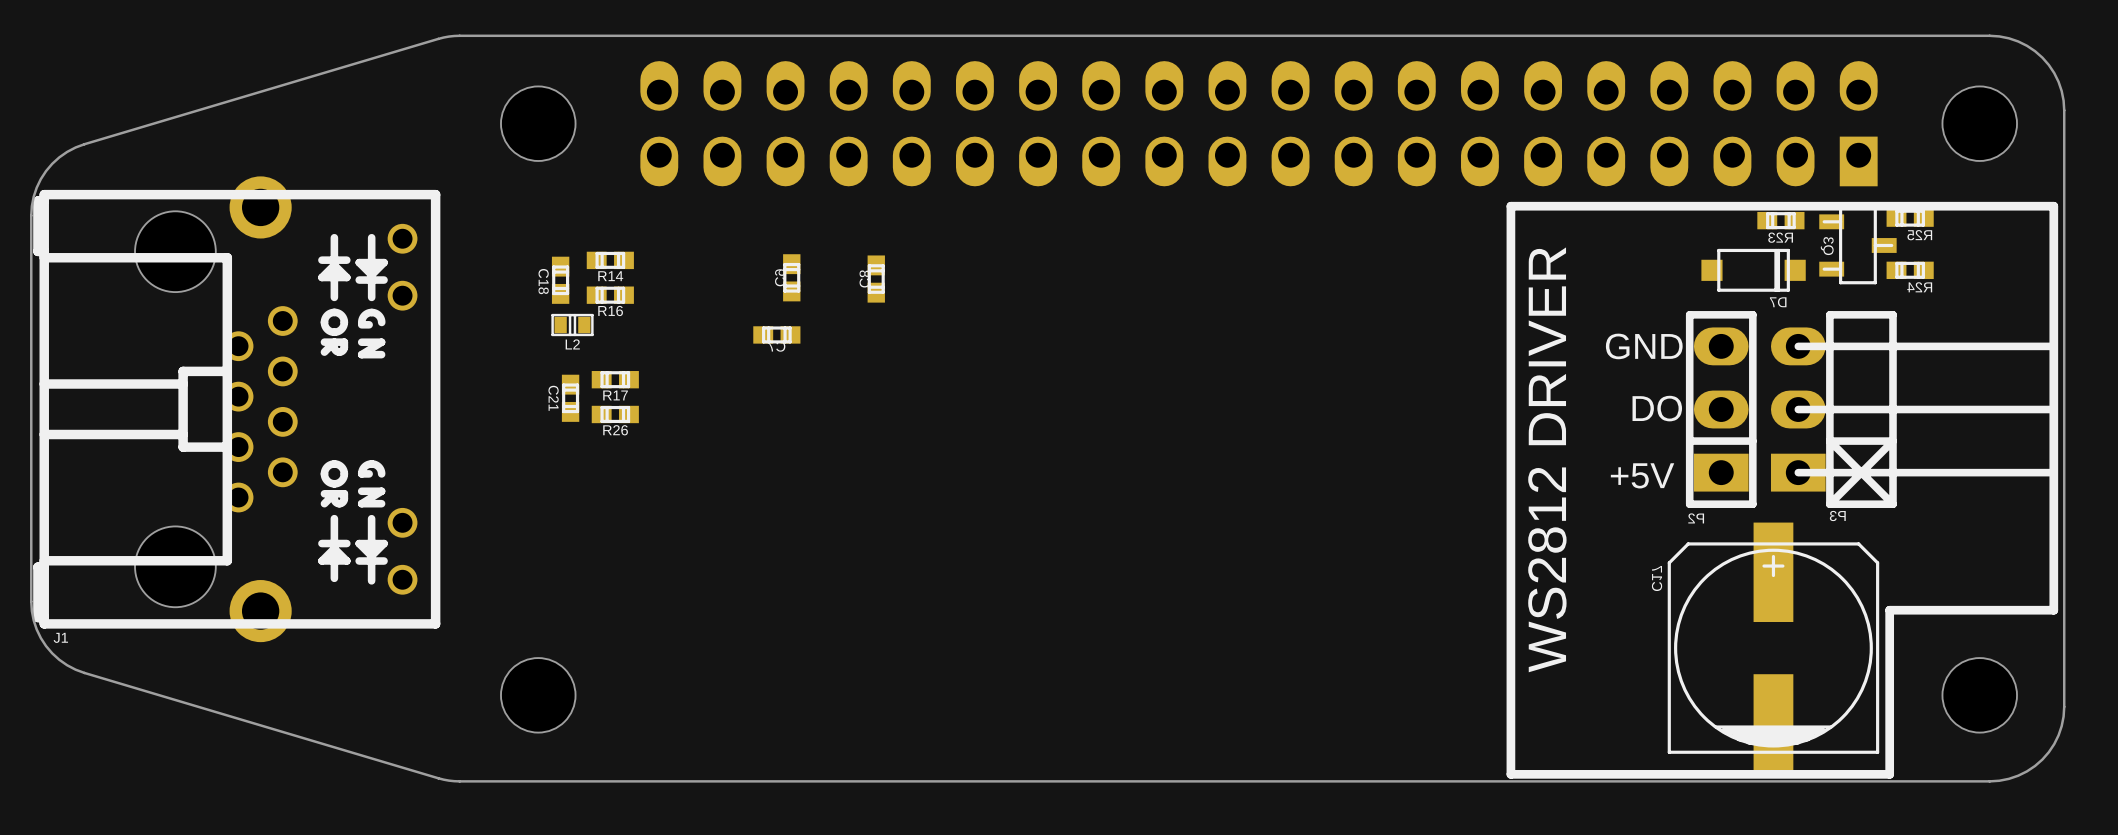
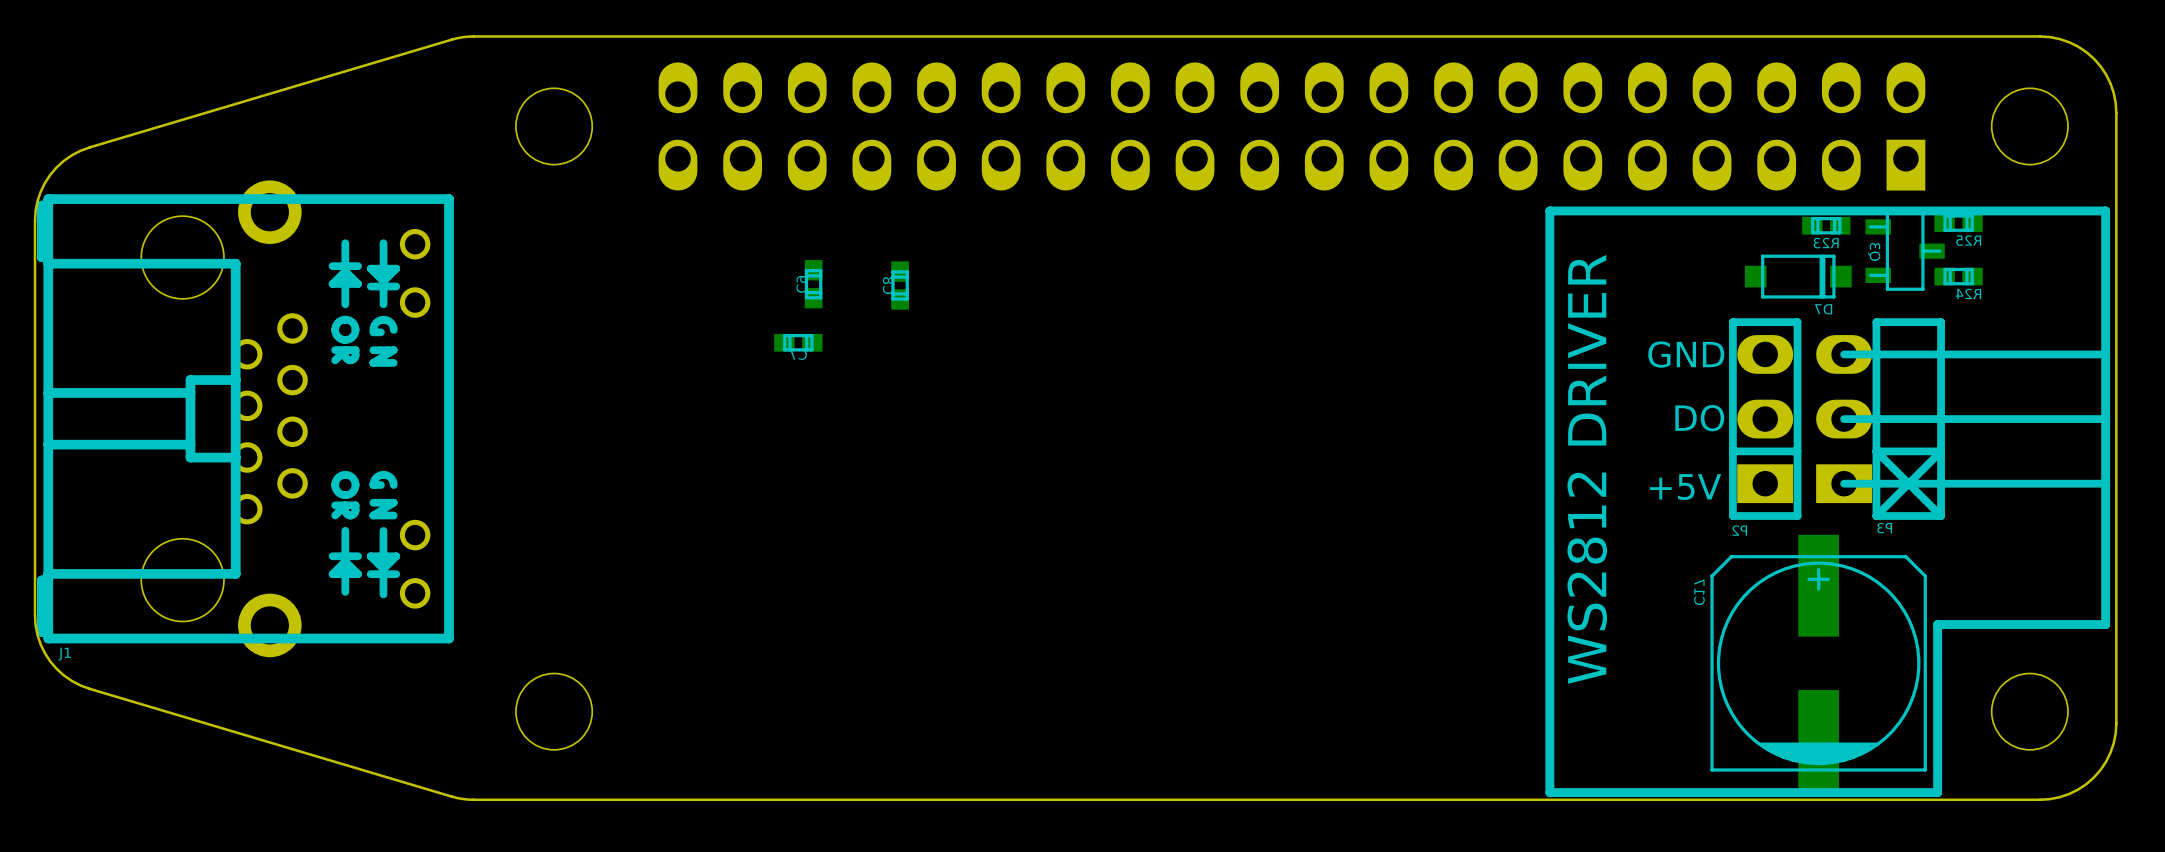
R14: (610, 260) -> none
C18: (560, 280) -> none
R16: (610, 295) -> none
L2: (572, 325) -> none
R17: (615, 379) -> none
C21: (570, 398) -> none
R26: (615, 414) -> none

